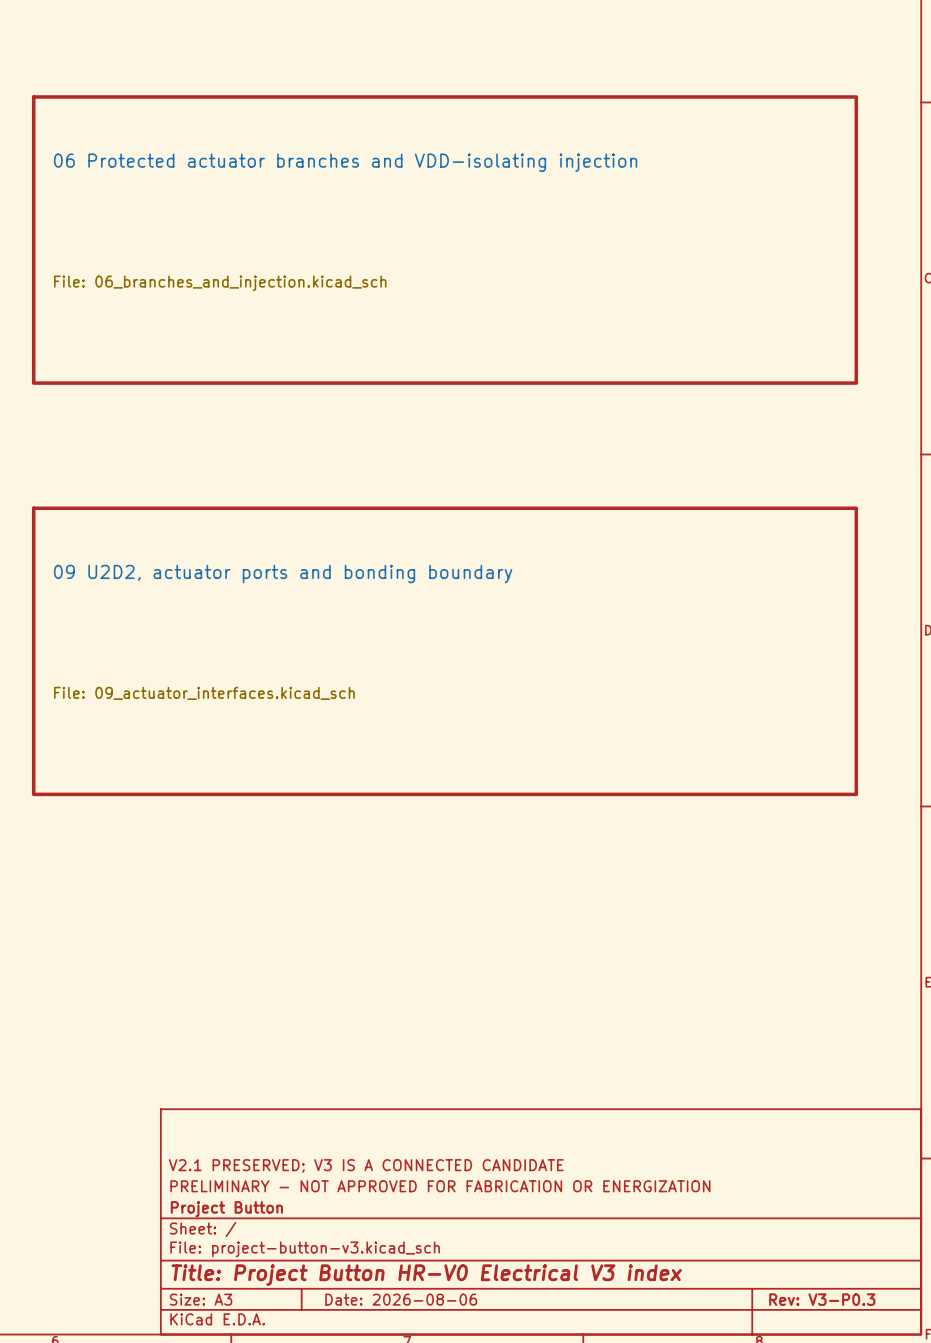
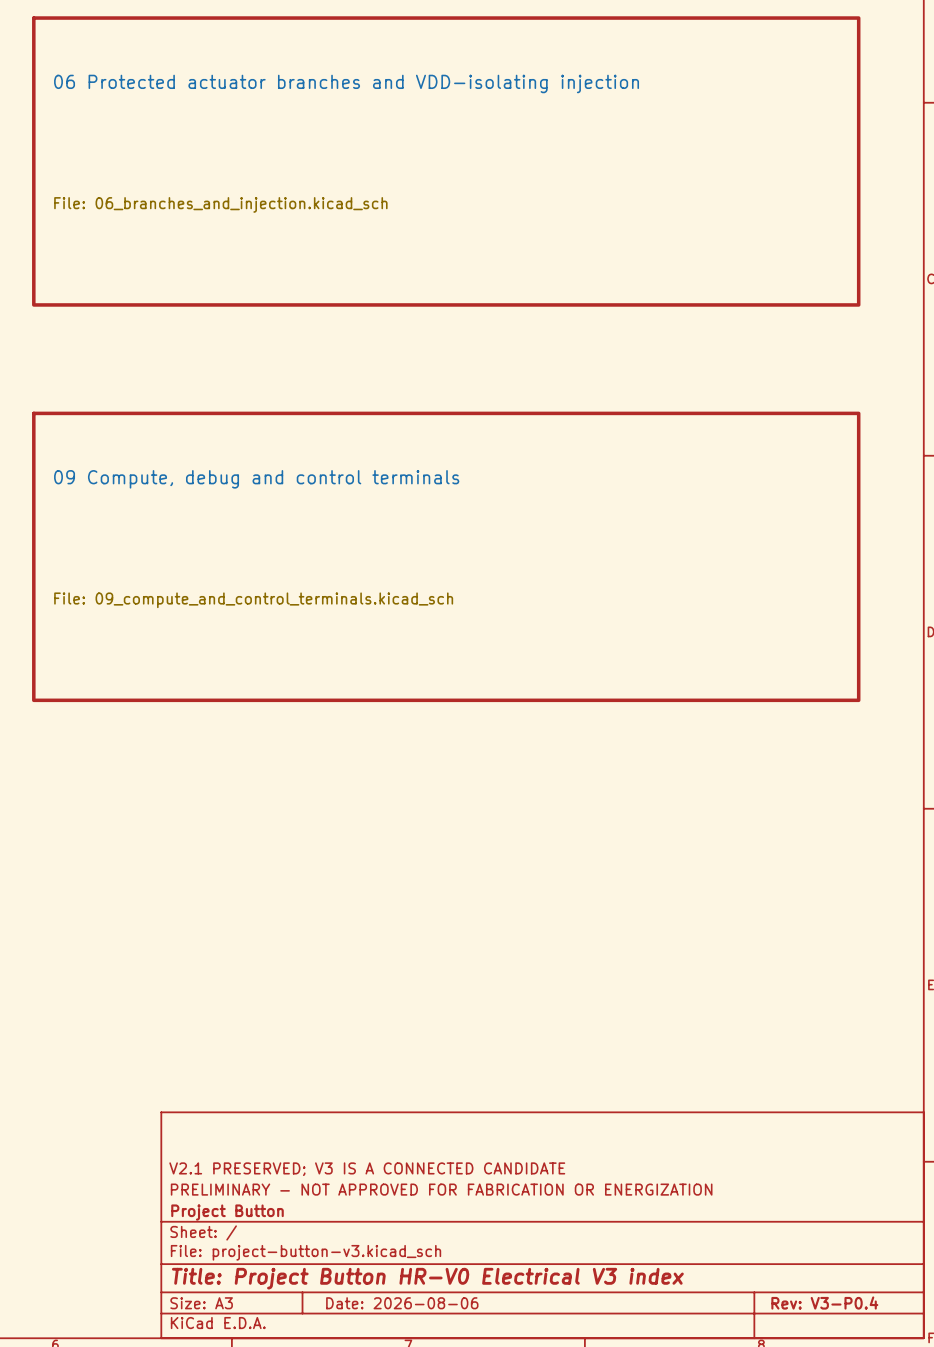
sheet 06 Protected actuator branches and VDD-isolating injection position: (445, 240) -> (446, 161)
sheet 09 Compute, debug and control terminals: none -> File: 09_compute_and_control_terminals.kicad_sch (446, 556)
sheet 09 U2D2, actuator ports and bonding boundary: File: 09_actuator_interfaces.kicad_sch (445, 651) -> none
title block: Rev: V3-P0.3 (822, 1299) -> Rev: V3-P0.4 (824, 1303)

